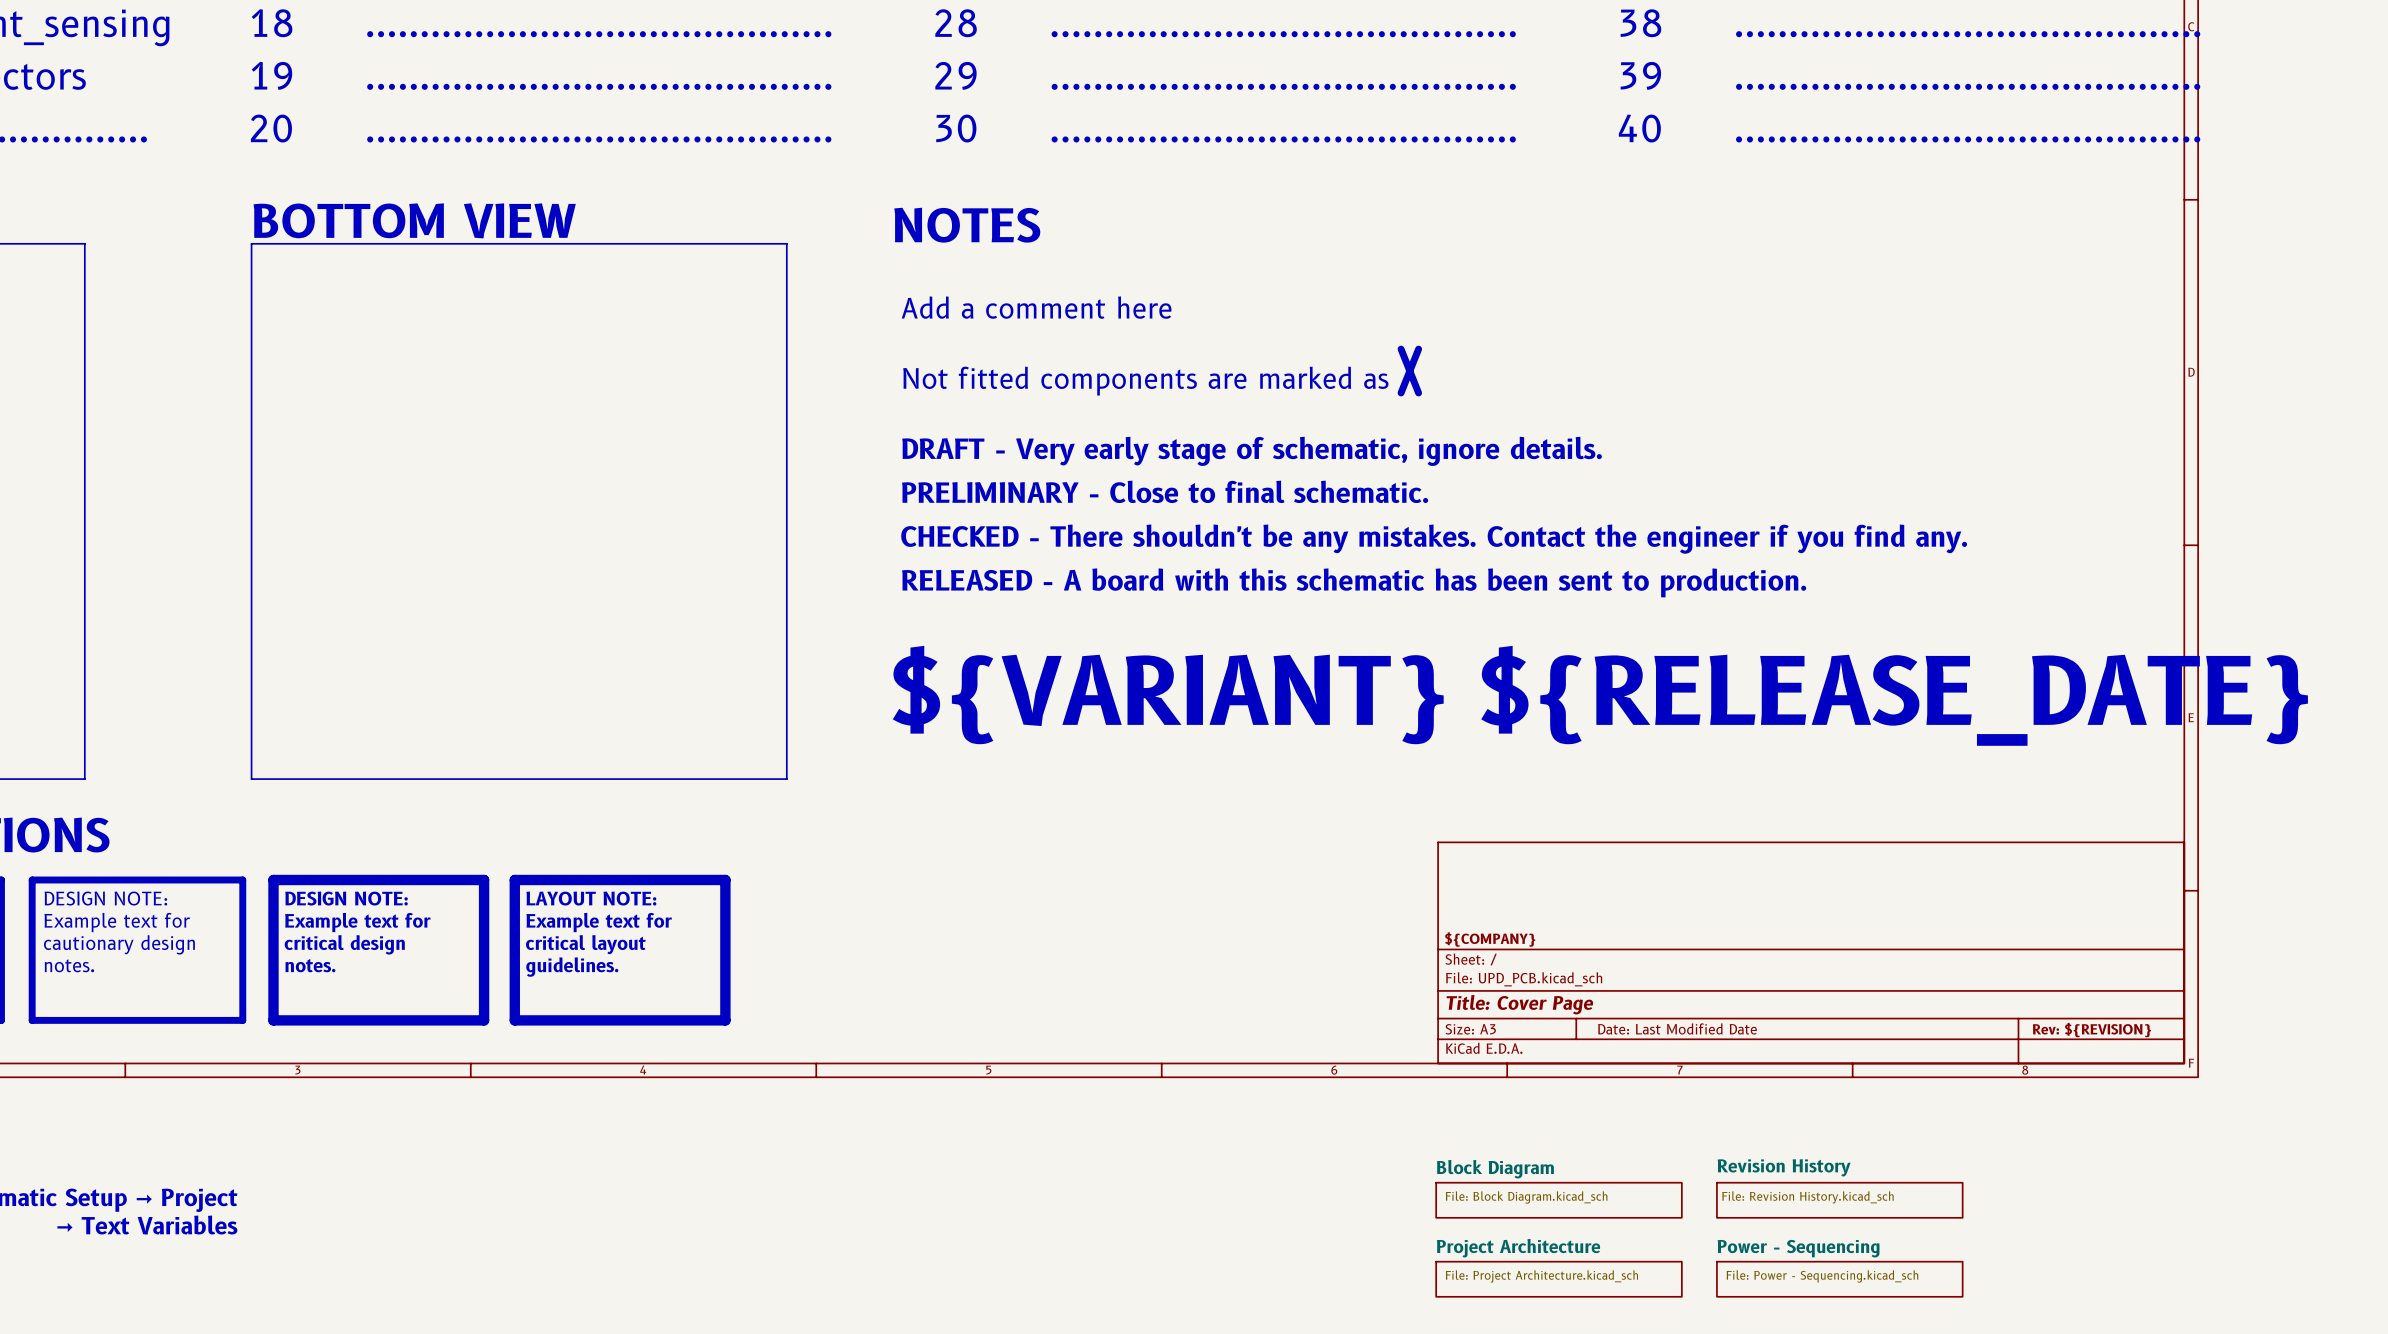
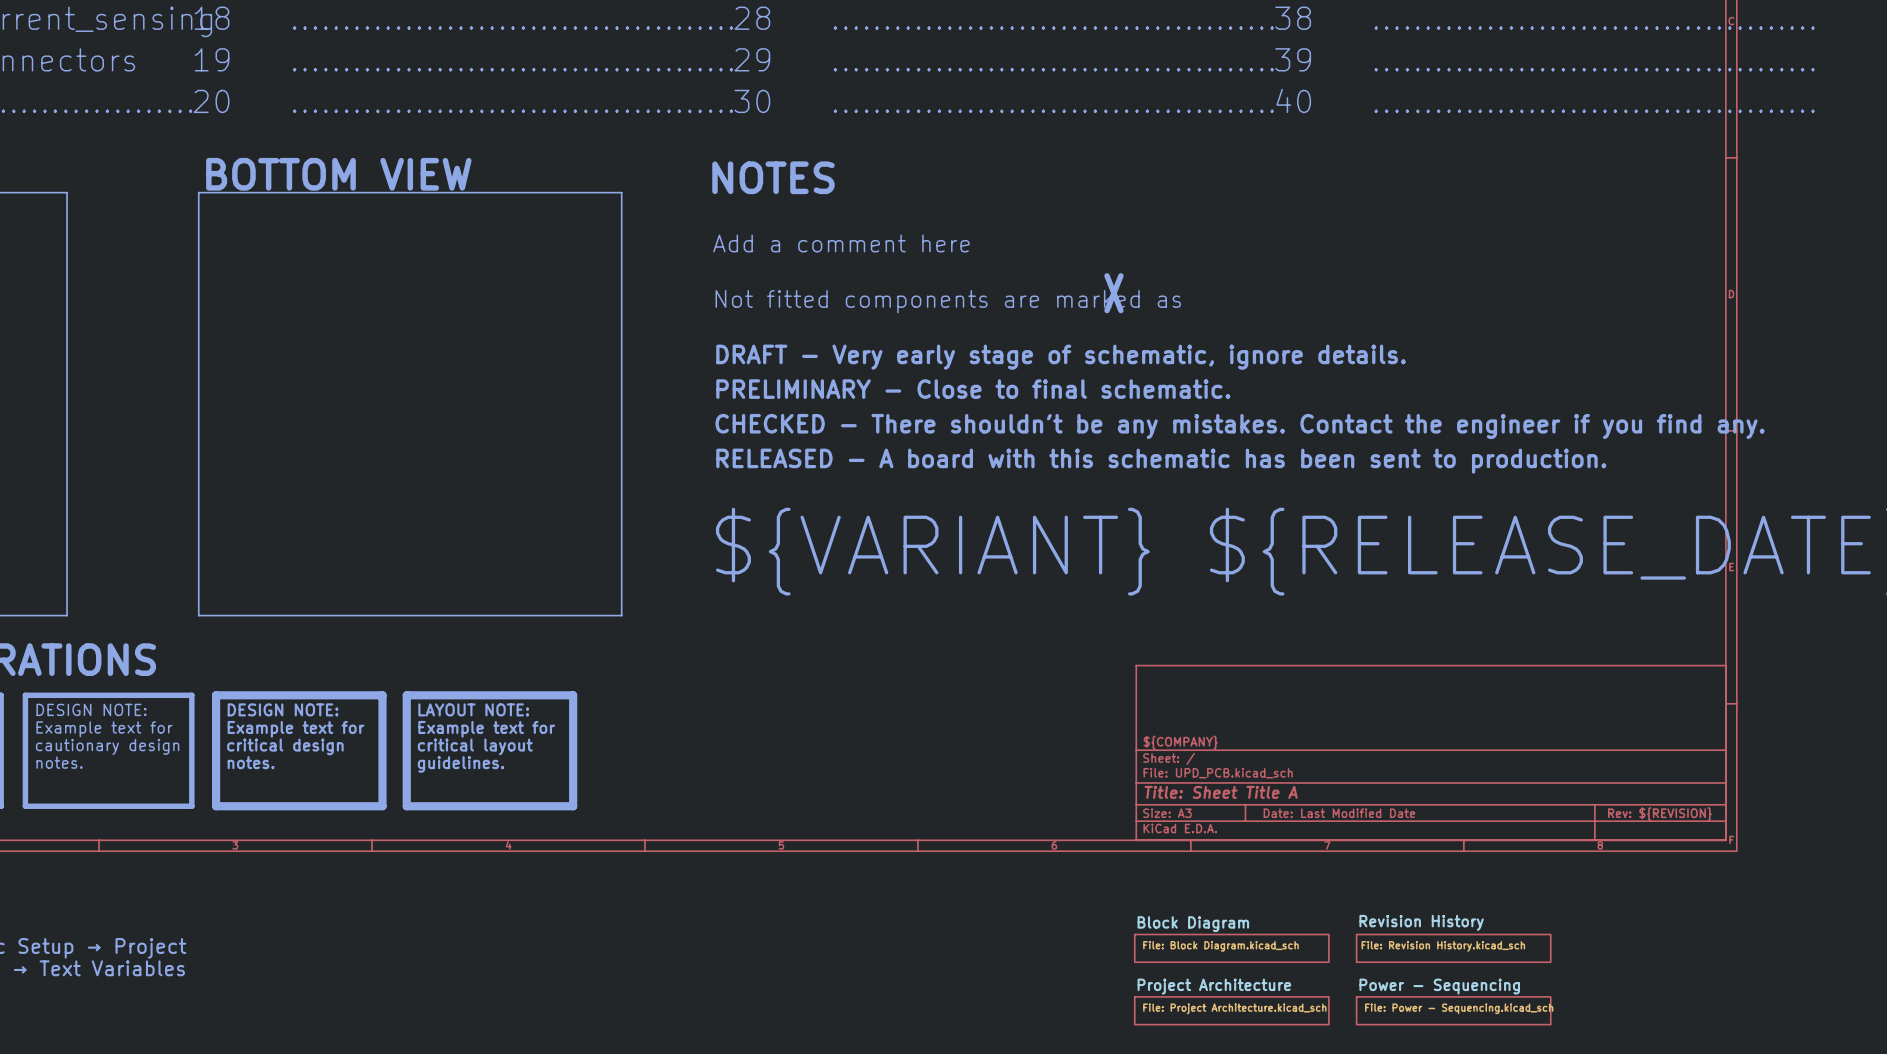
title block: Title: Cover Page (1519, 1004) -> Title: Sheet Title A (1221, 792)

